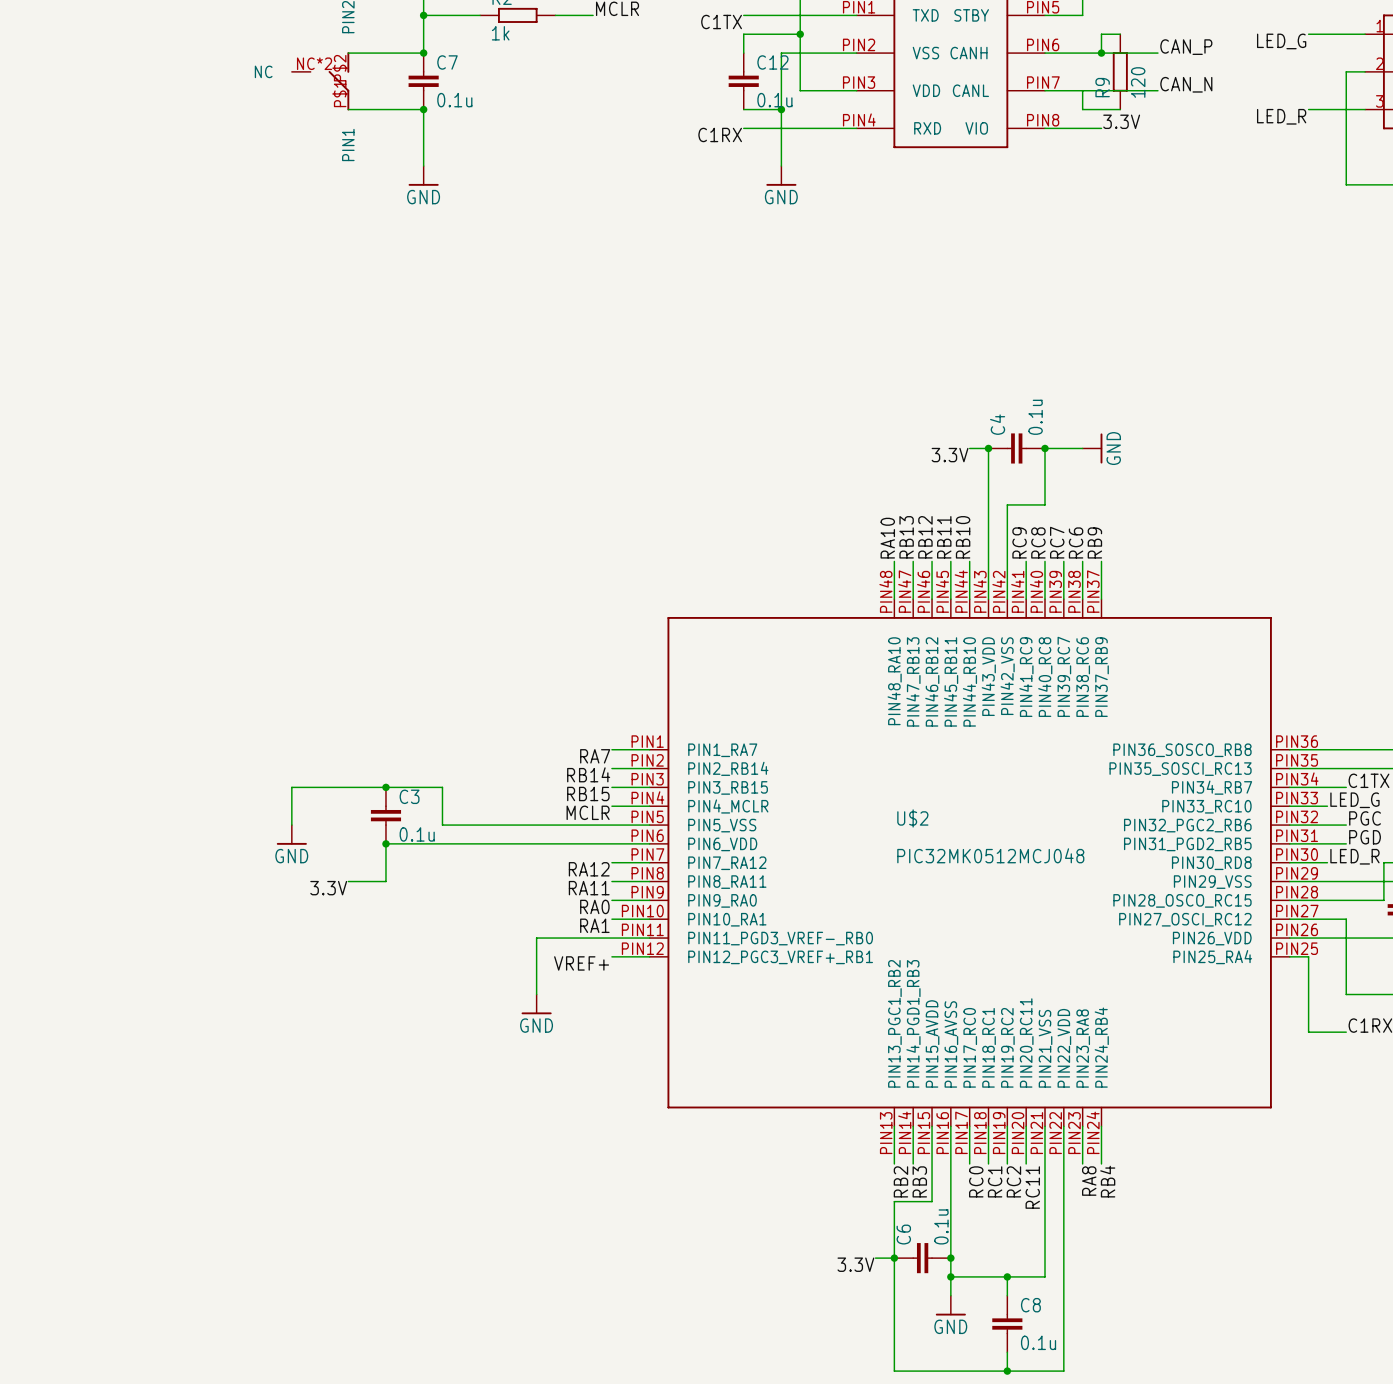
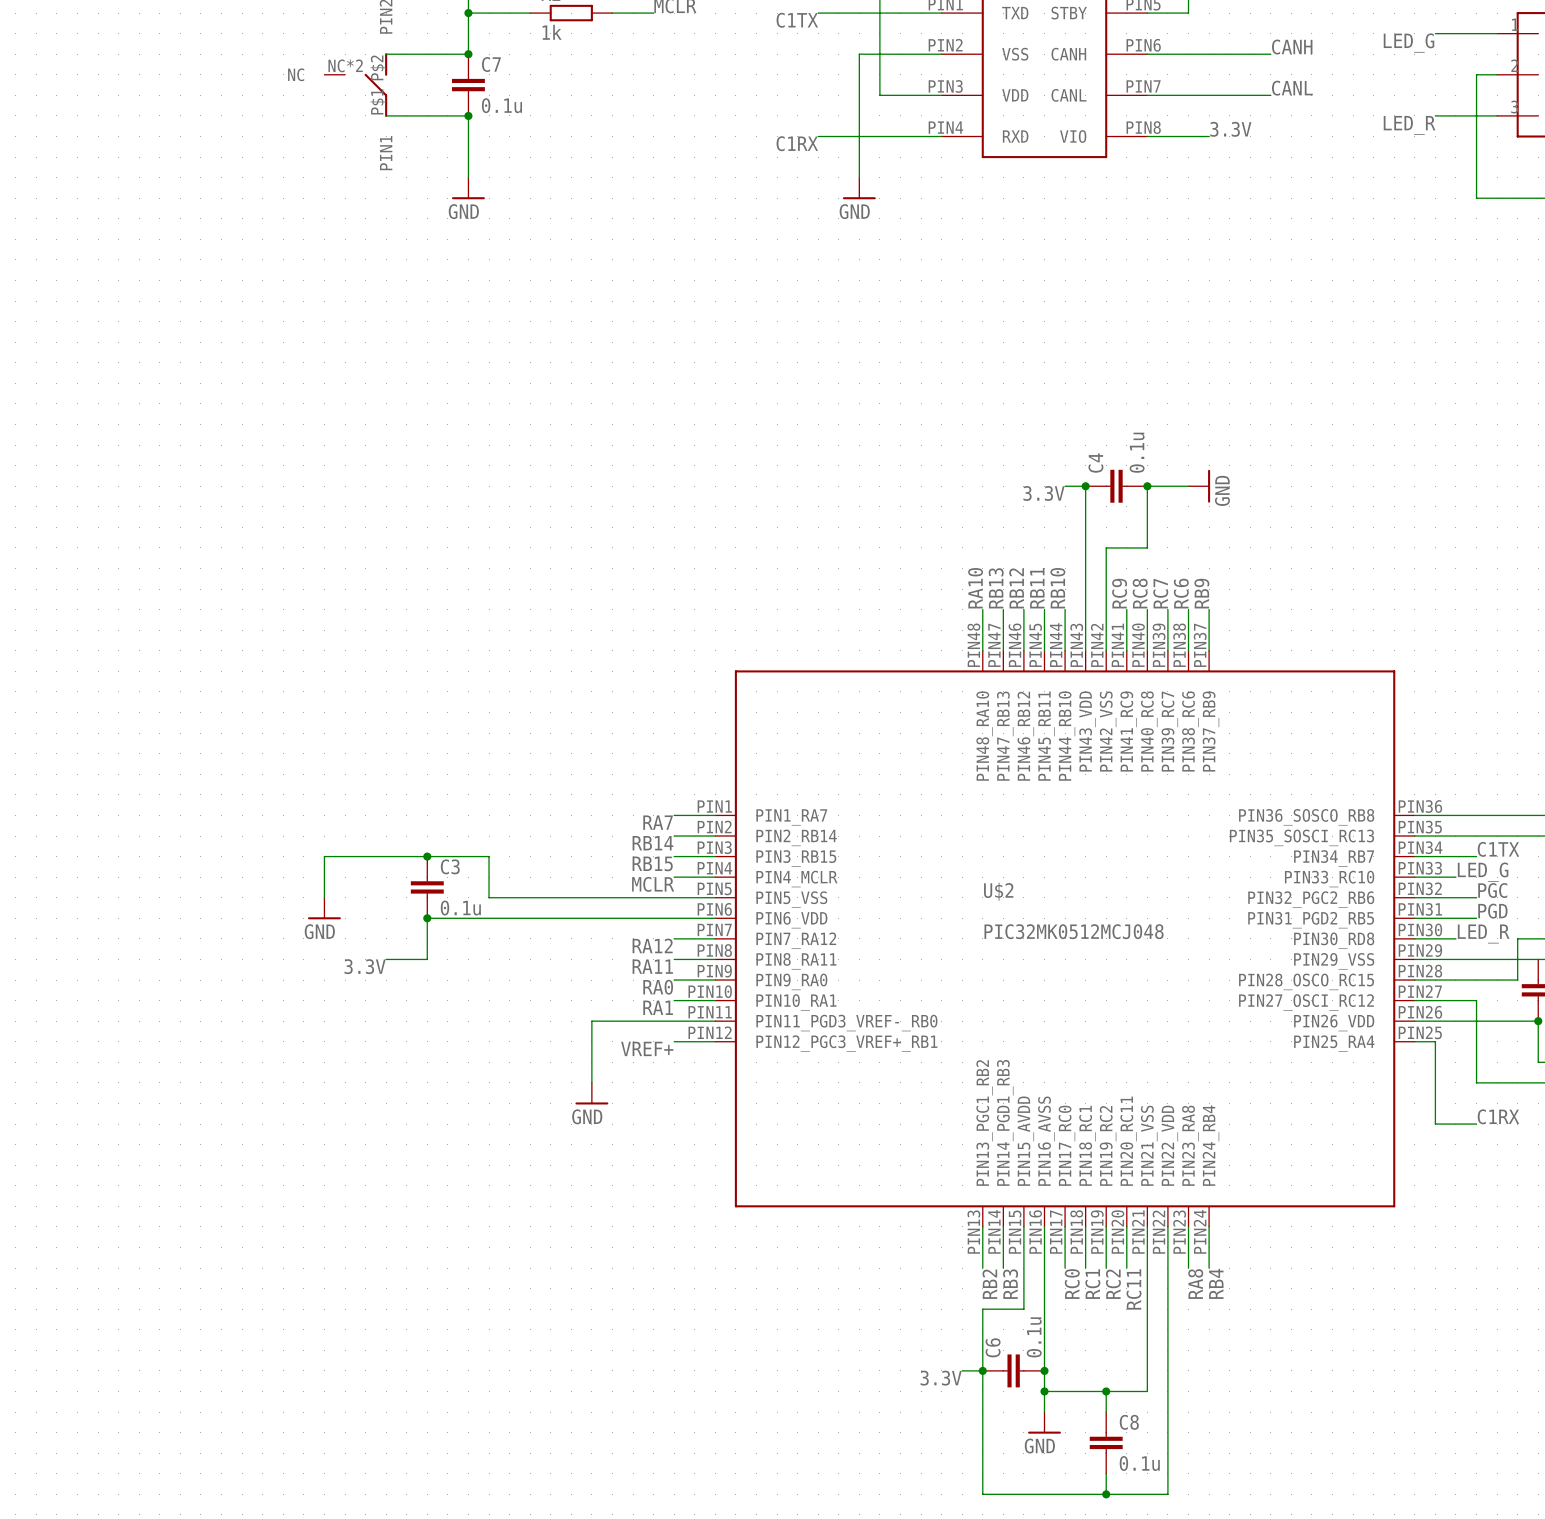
wire: (800, 34) (743, 34) (743, 53) -> none
junction: (800, 34) -> none
wire: (1120, 34) (1101, 34) (1101, 53) -> none
label: CAN_P (1186, 47) -> CANH (1292, 47)
junction: (1101, 53) -> none
R9: 120 (1120, 71) -> none
C12: 0.1u (743, 81) -> none
label: CAN_N (1186, 84) -> CANL (1292, 88)
wire: (1082, 90) (1082, 109) (1120, 109) -> none
wire: (743, 109) (781, 109) -> none
junction: (781, 109) -> none

